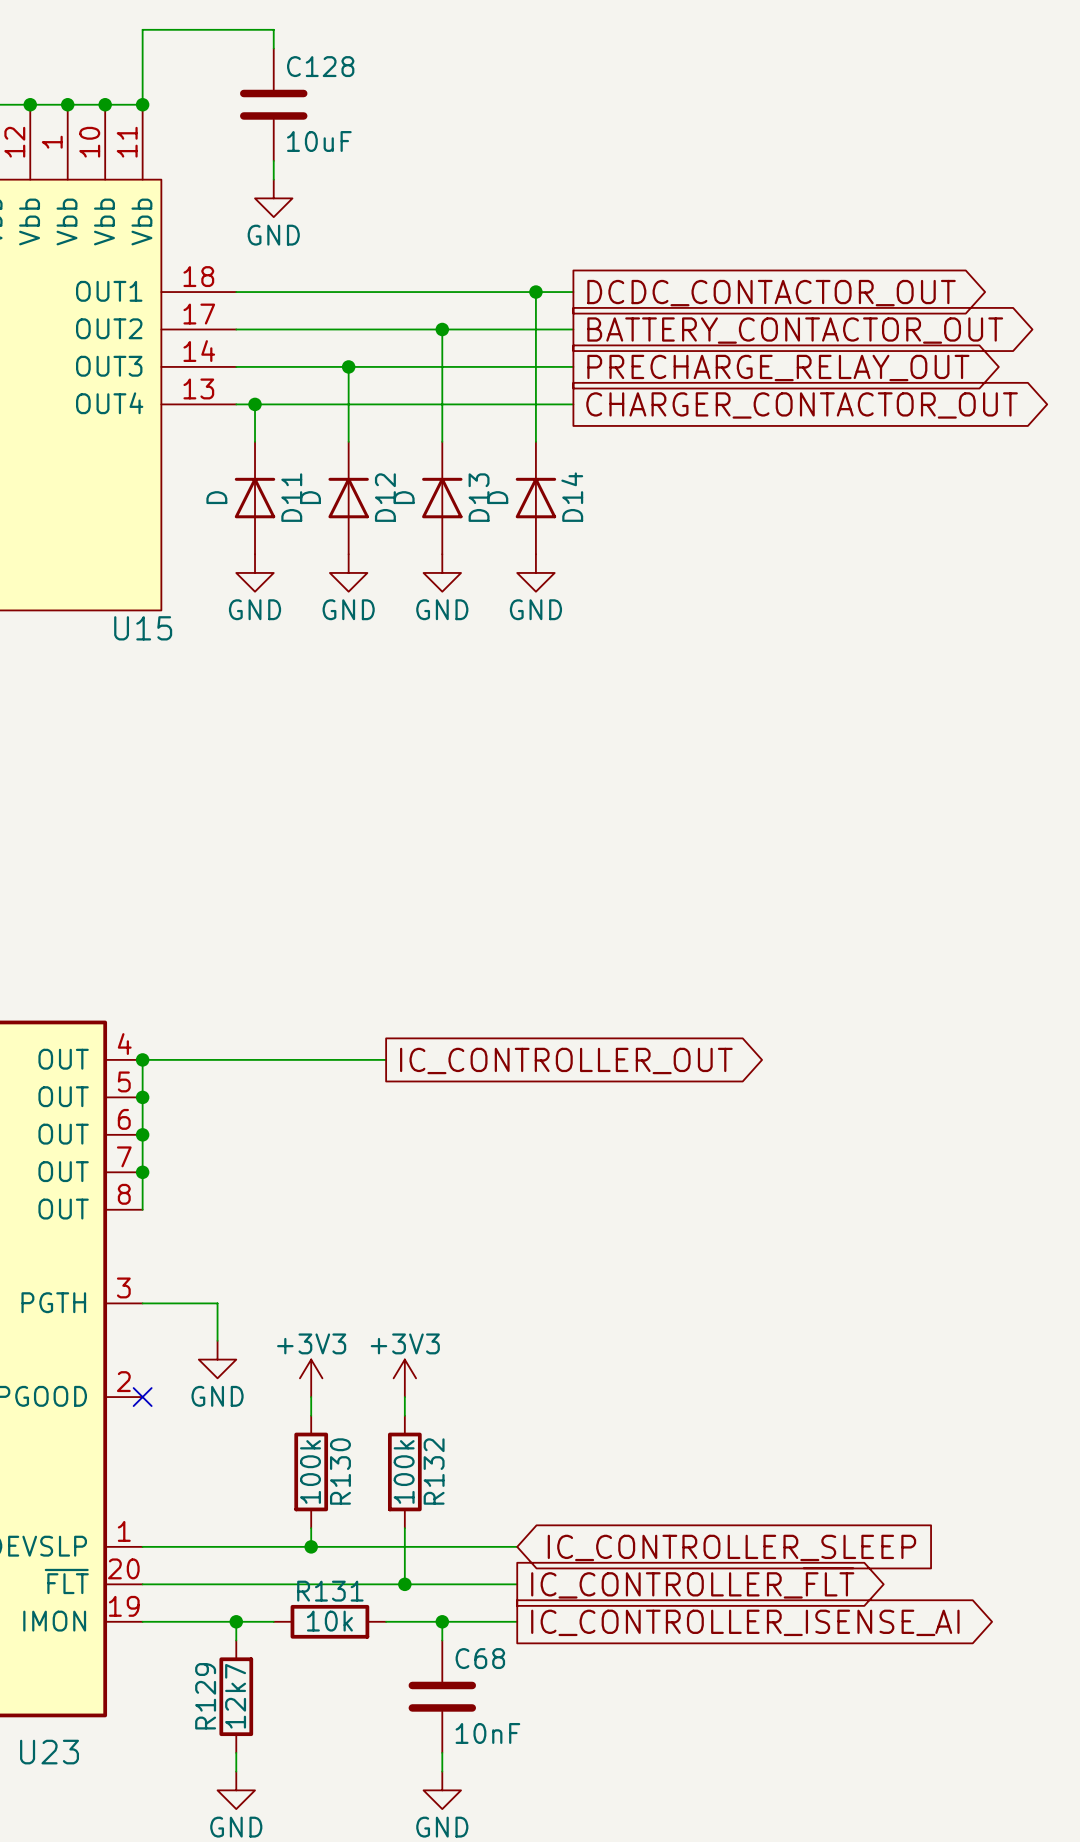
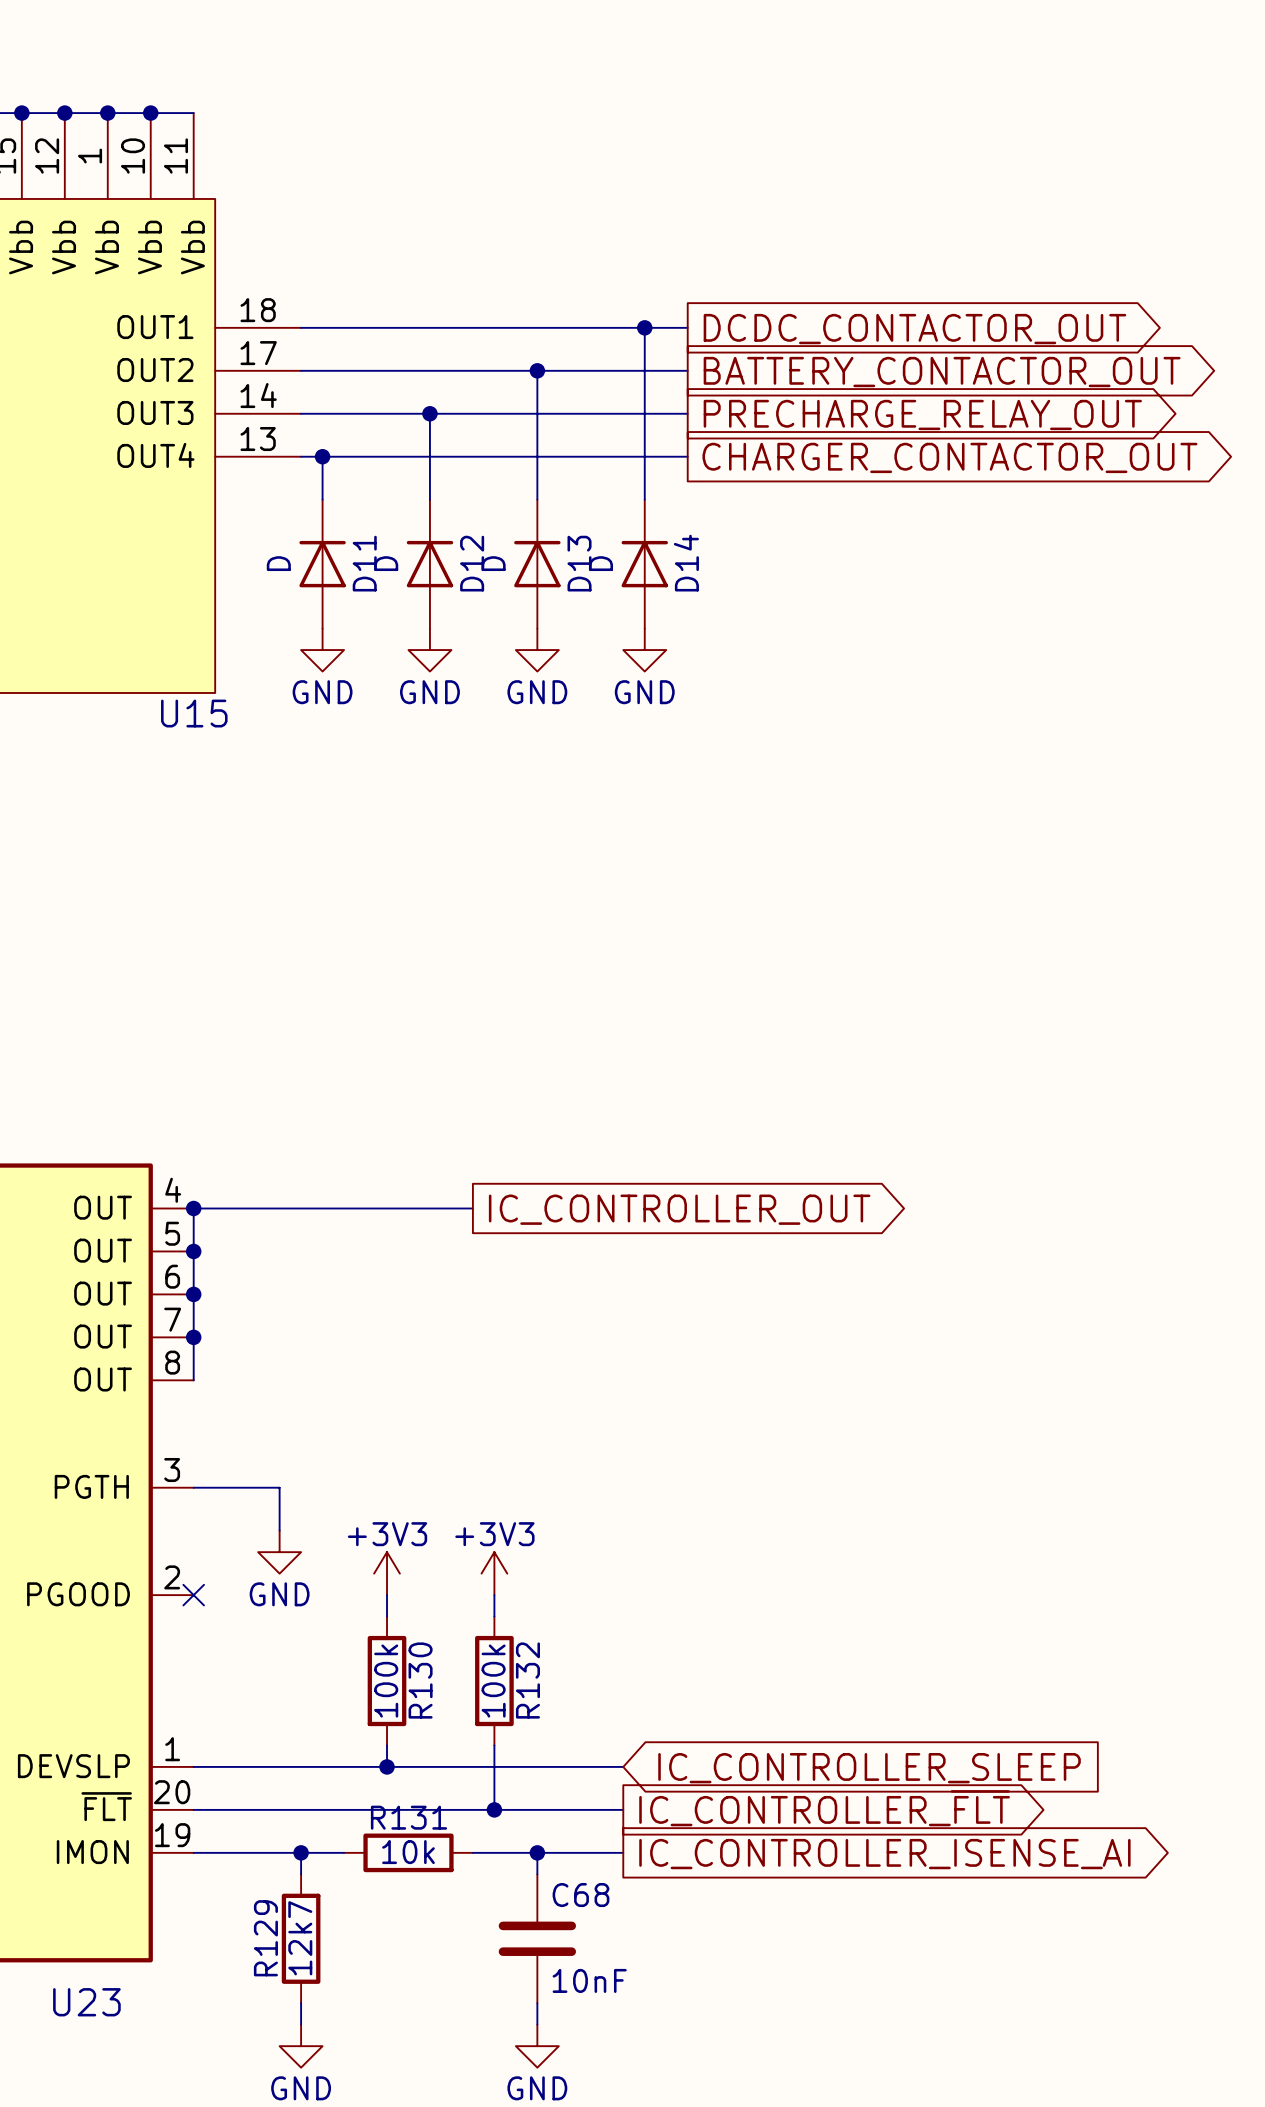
wire: (273, 48) (273, 29) (142, 29) (142, 104) -> none
junction: (142, 104) -> none
C128: 10uF (273, 104) -> none
wire: (273, 160) (273, 179) -> none
power symbol: GND (273, 198) -> none

